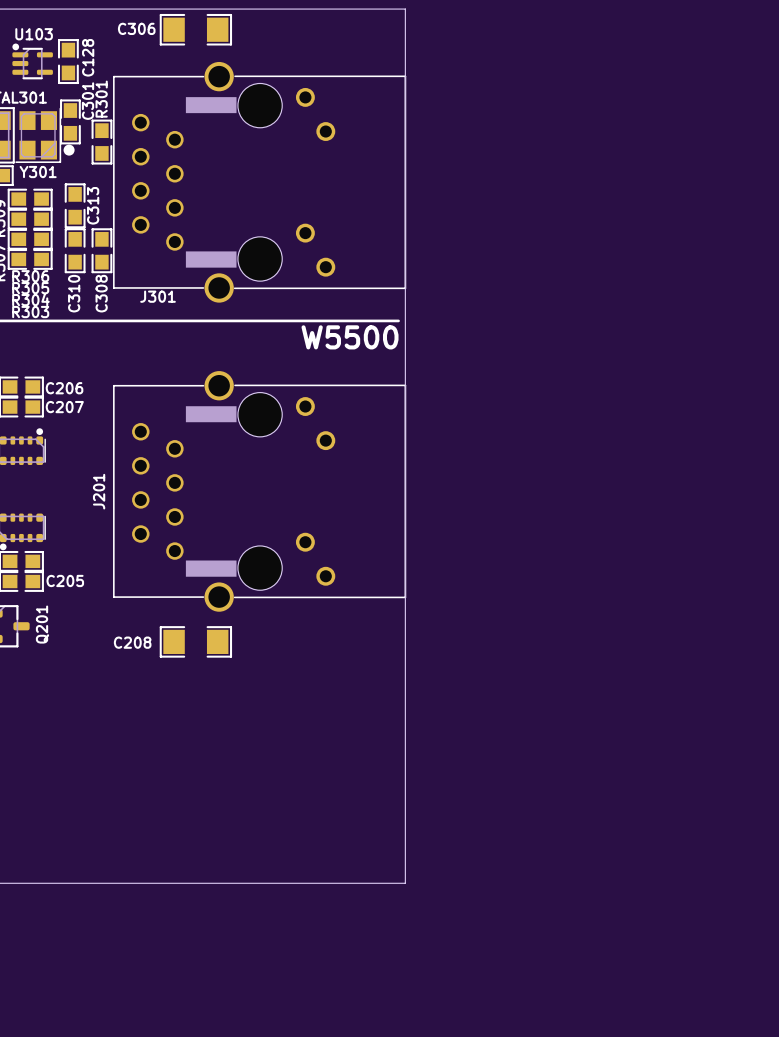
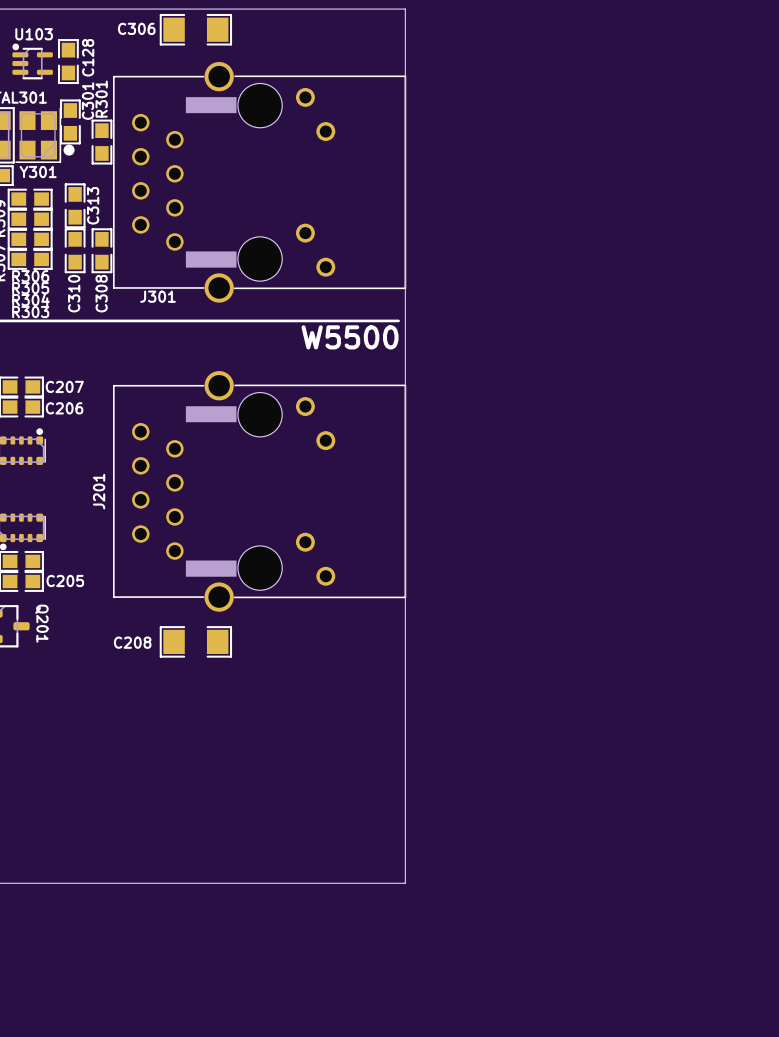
C206 name: C206 (64, 388) -> C207 (64, 386)
C207 name: C207 (64, 407) -> C206 (64, 408)
Q201 name rotation: 0° (42, 624) -> 180° (41, 623)

